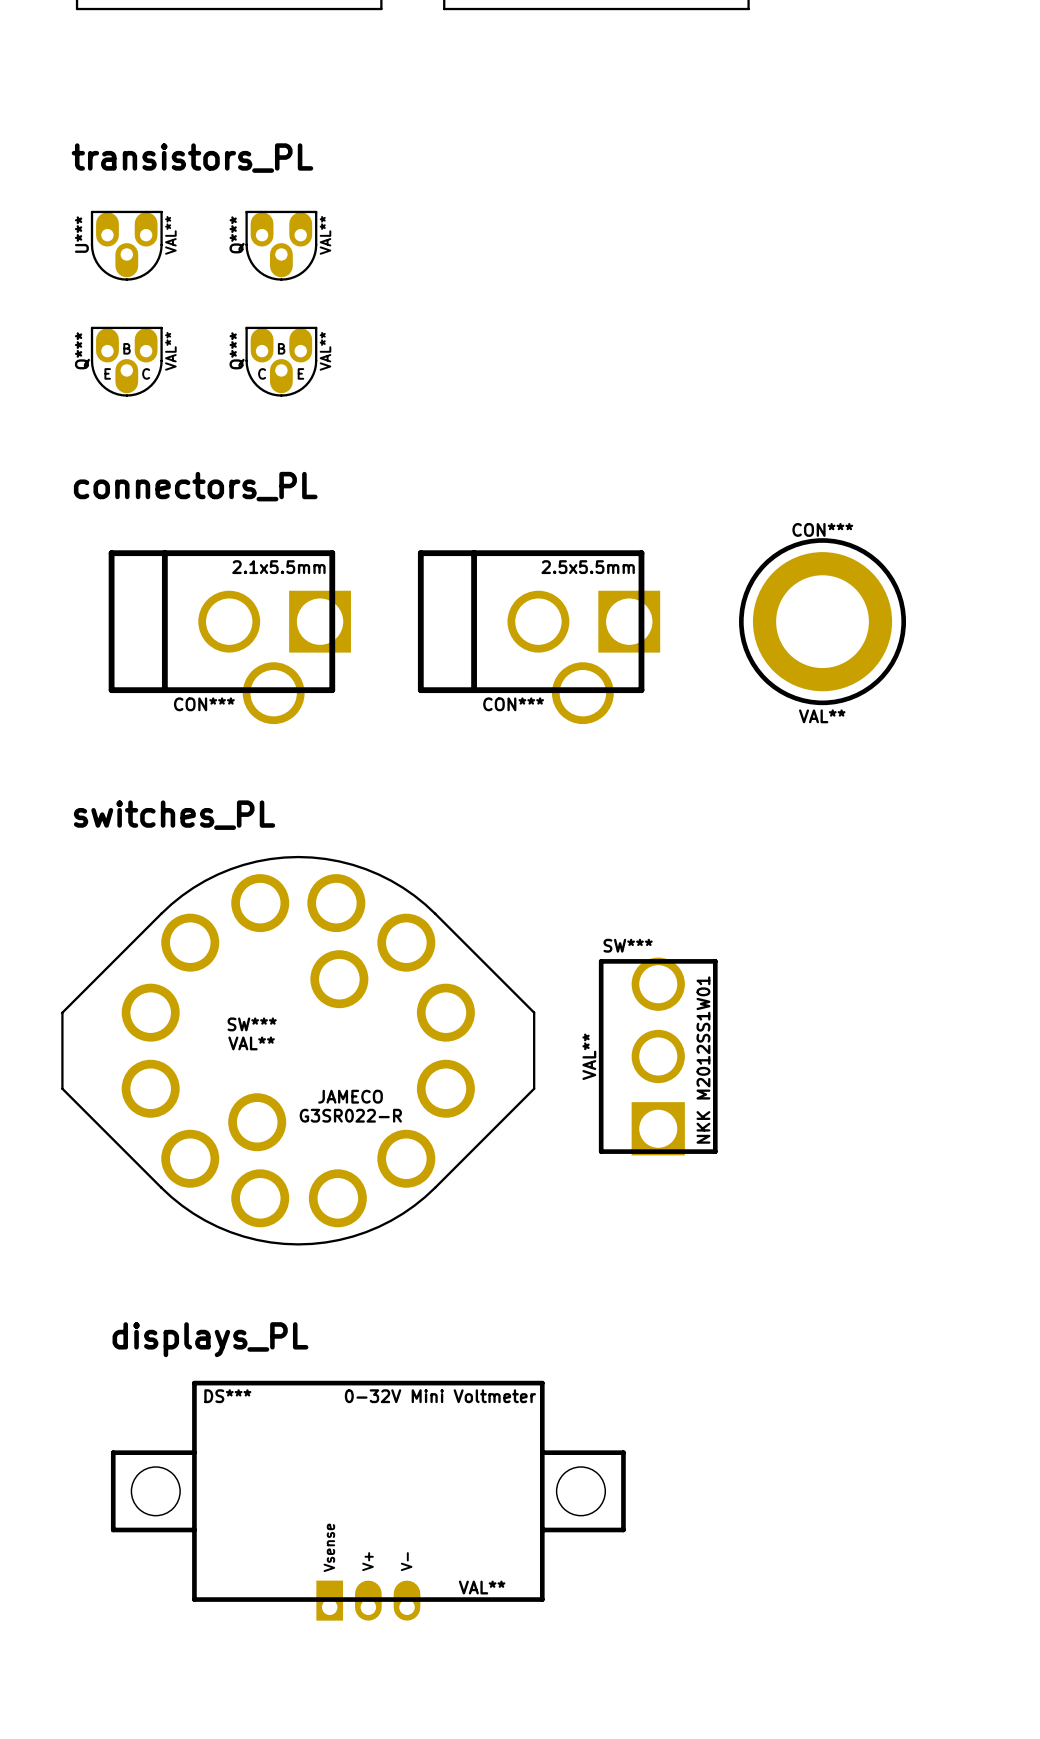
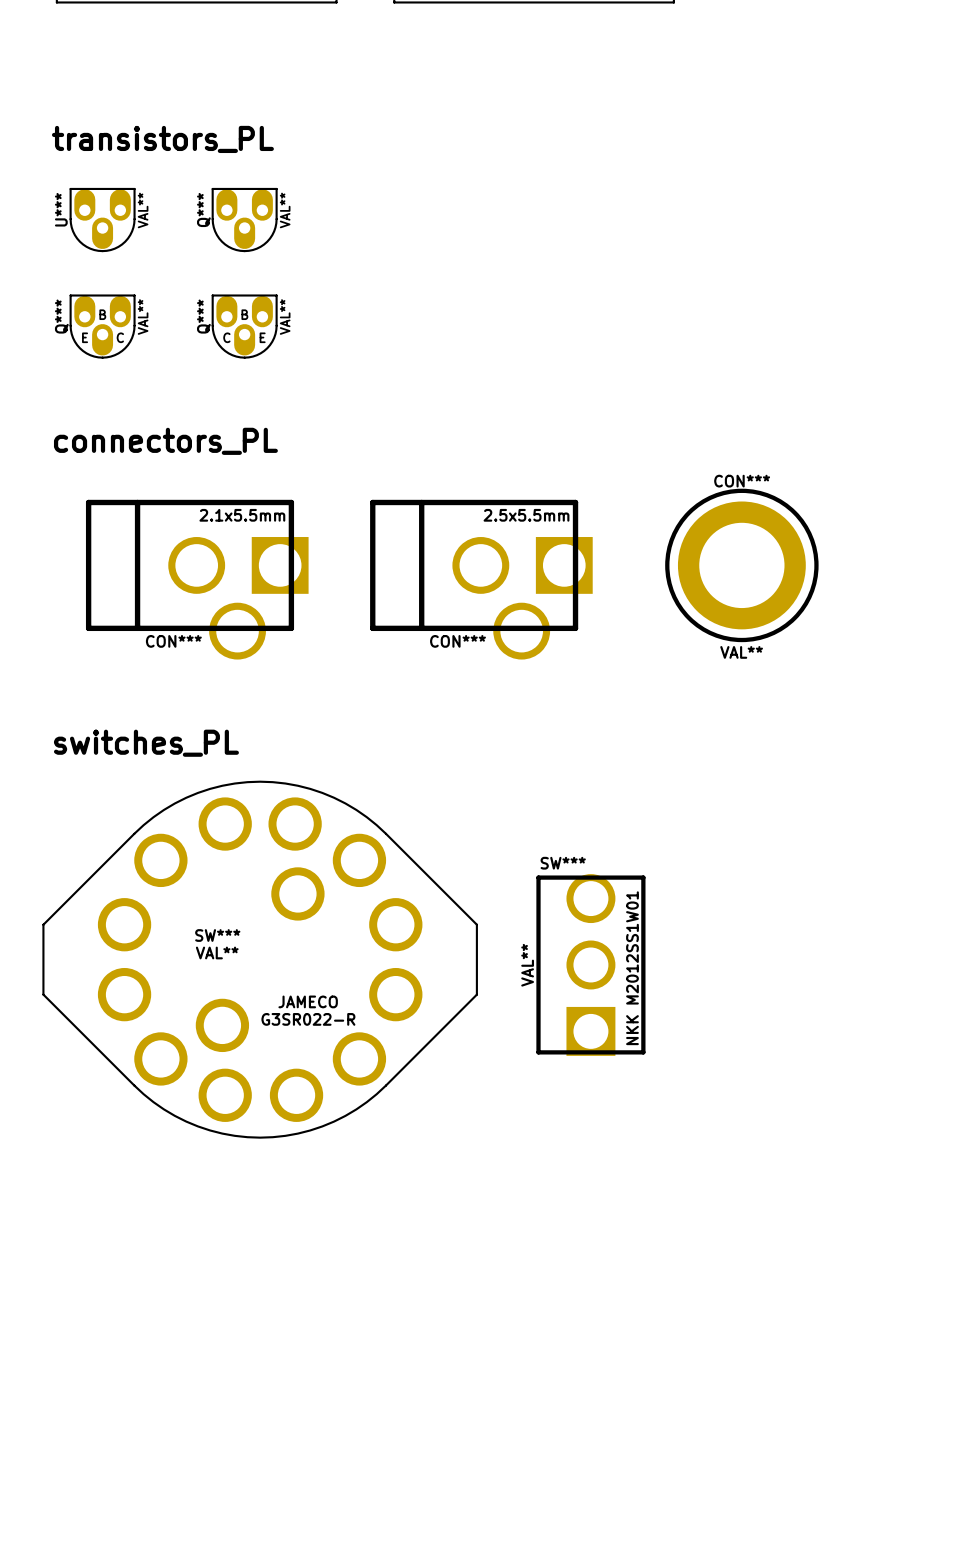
text: displays_PL (210, 1339) -> none
DS***: VAL** (368, 1500) -> none

